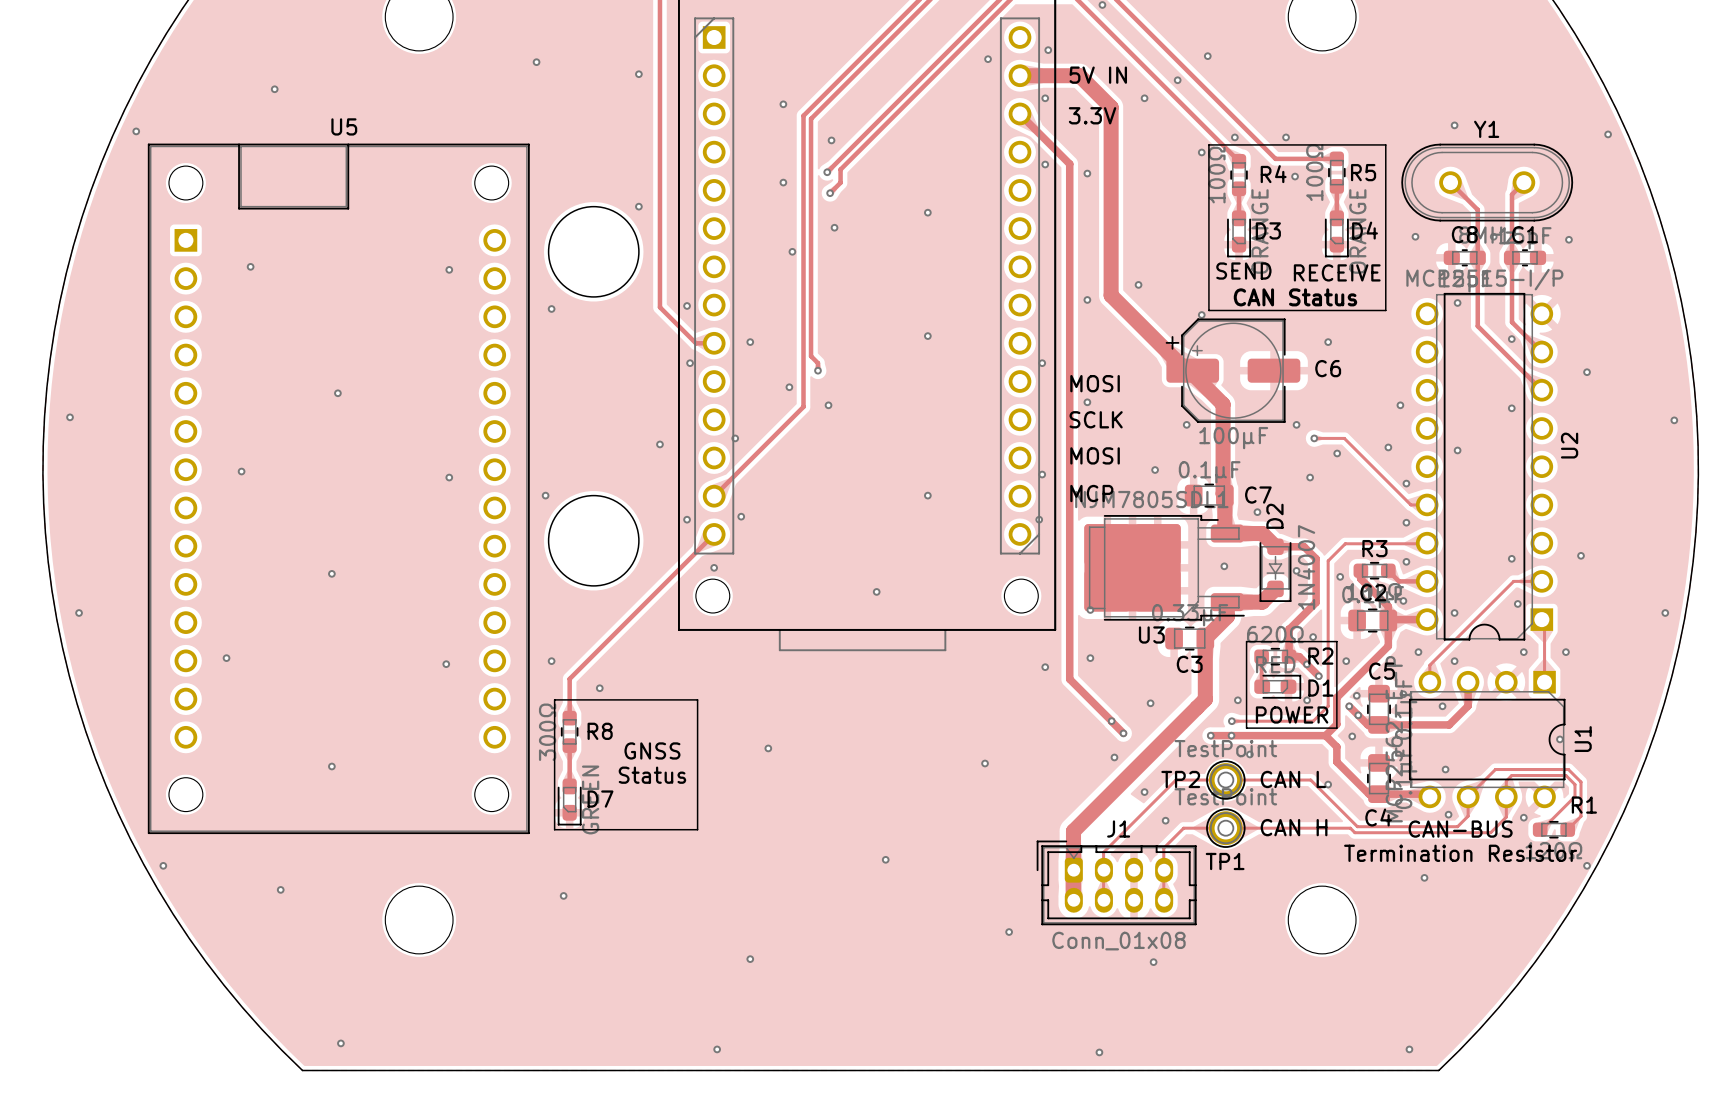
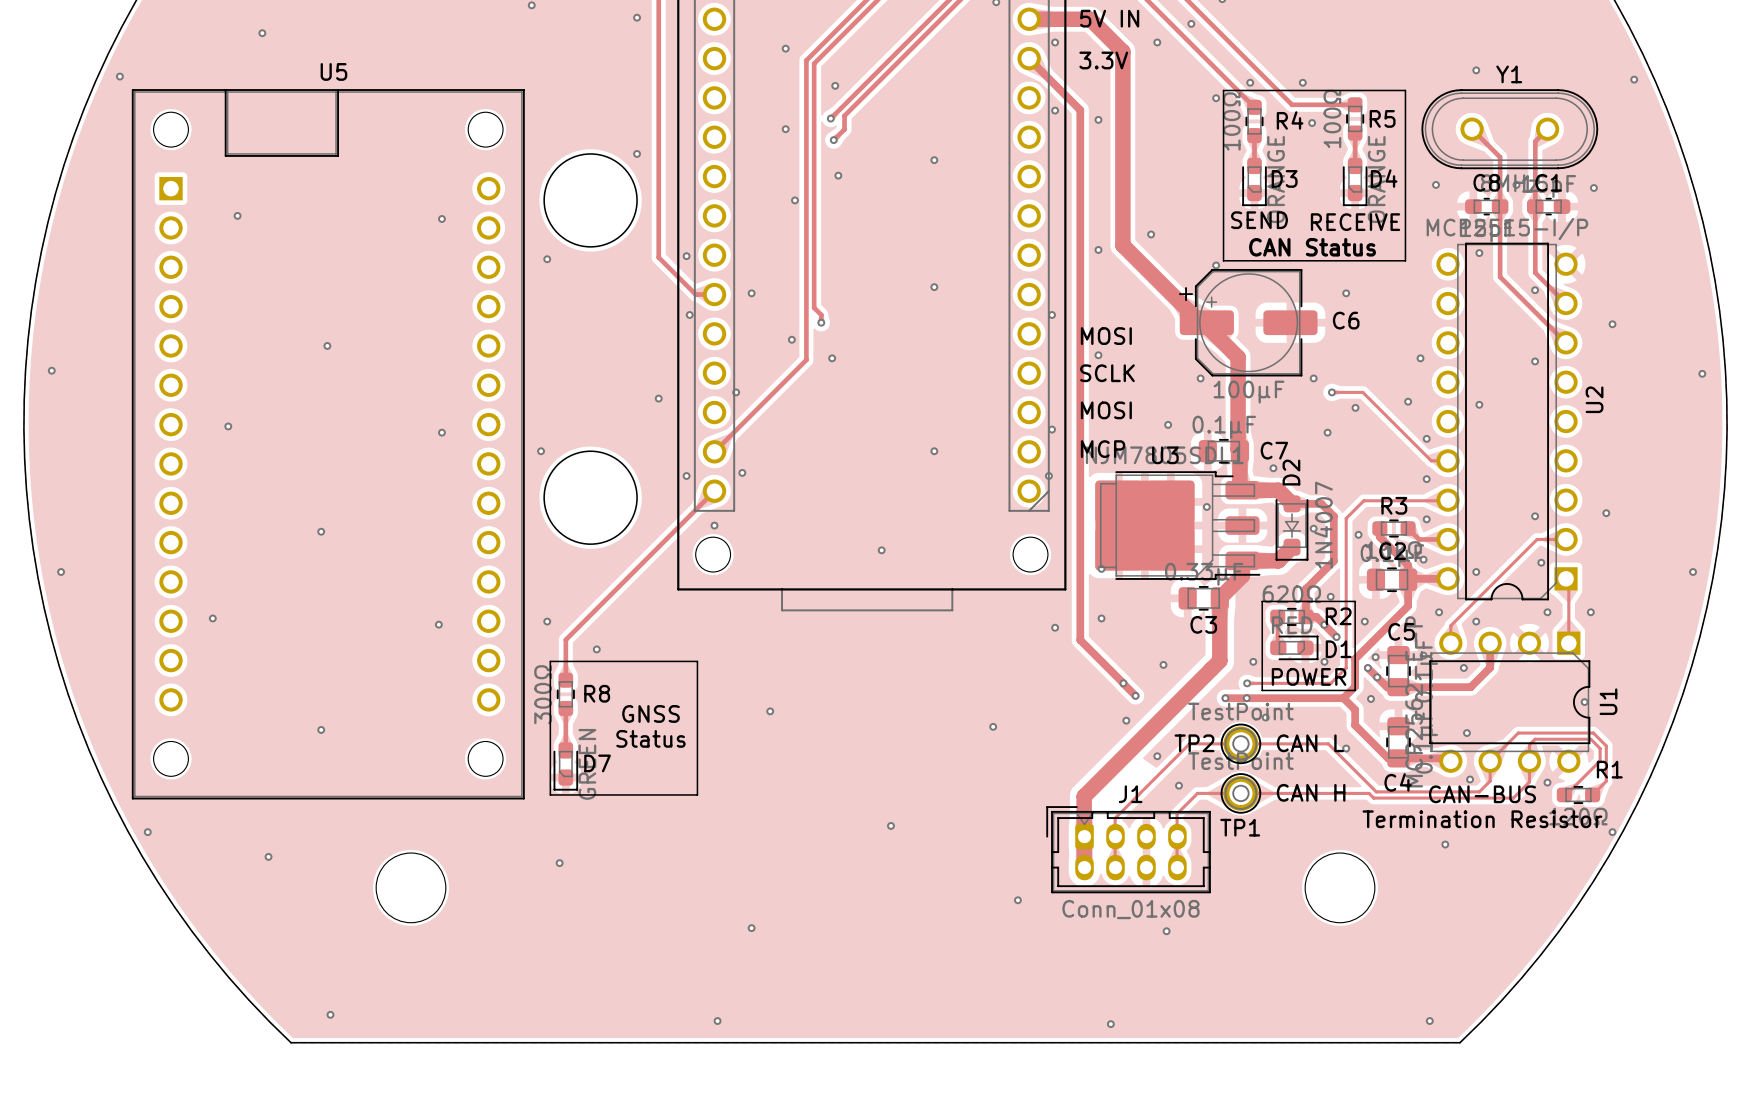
U3 footprint: [1084, 515, 1245, 621] -> [1095, 471, 1261, 580]
via position: (1224, 566) -> (1206, 506)
U3 name position: U3 (1151, 634) -> U3 (1165, 455)

